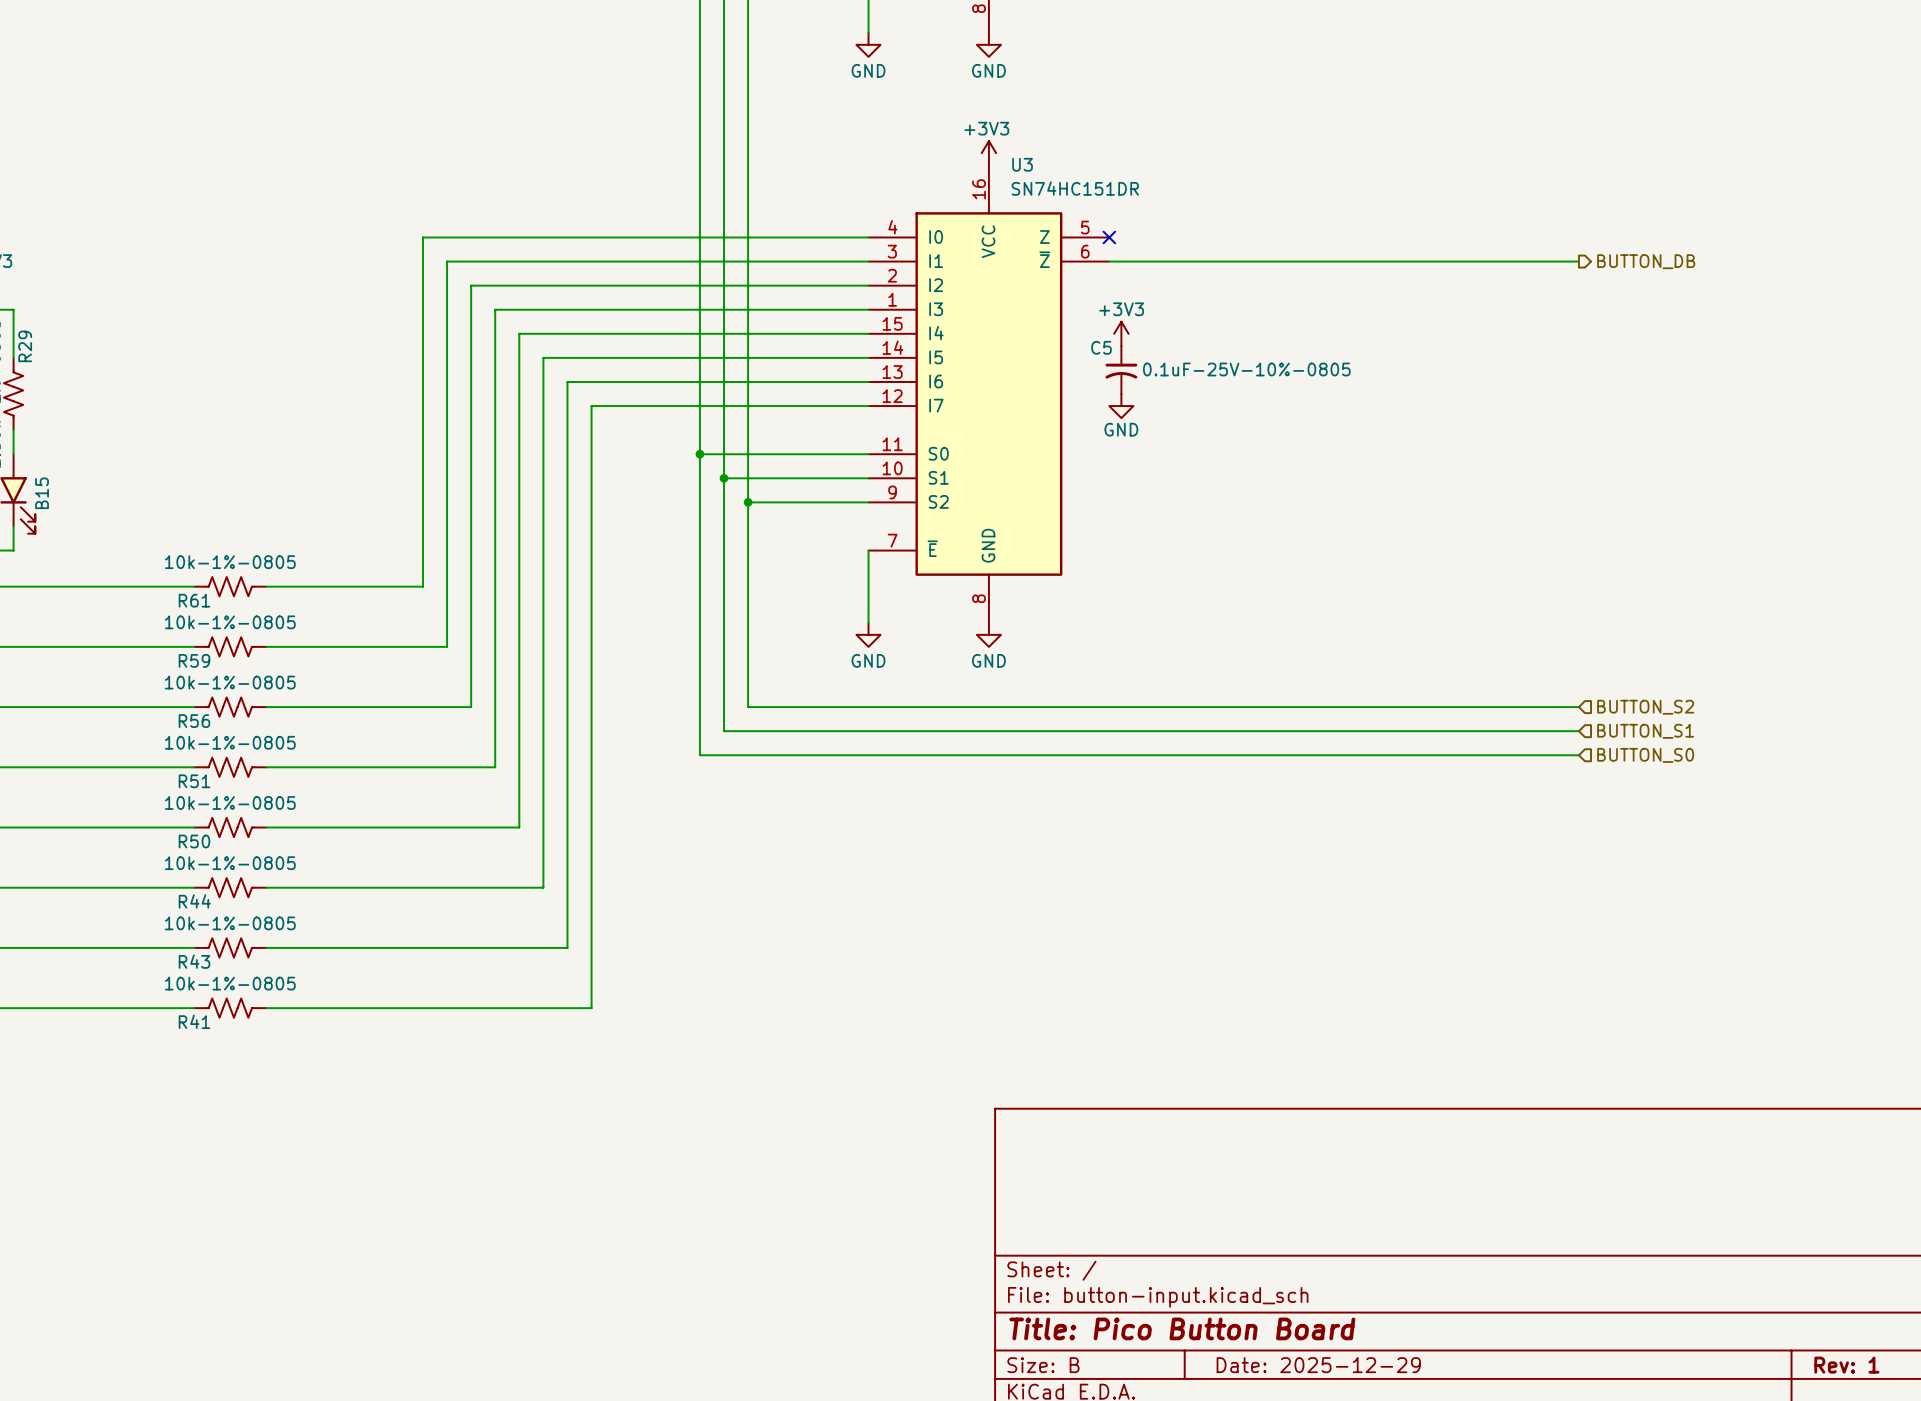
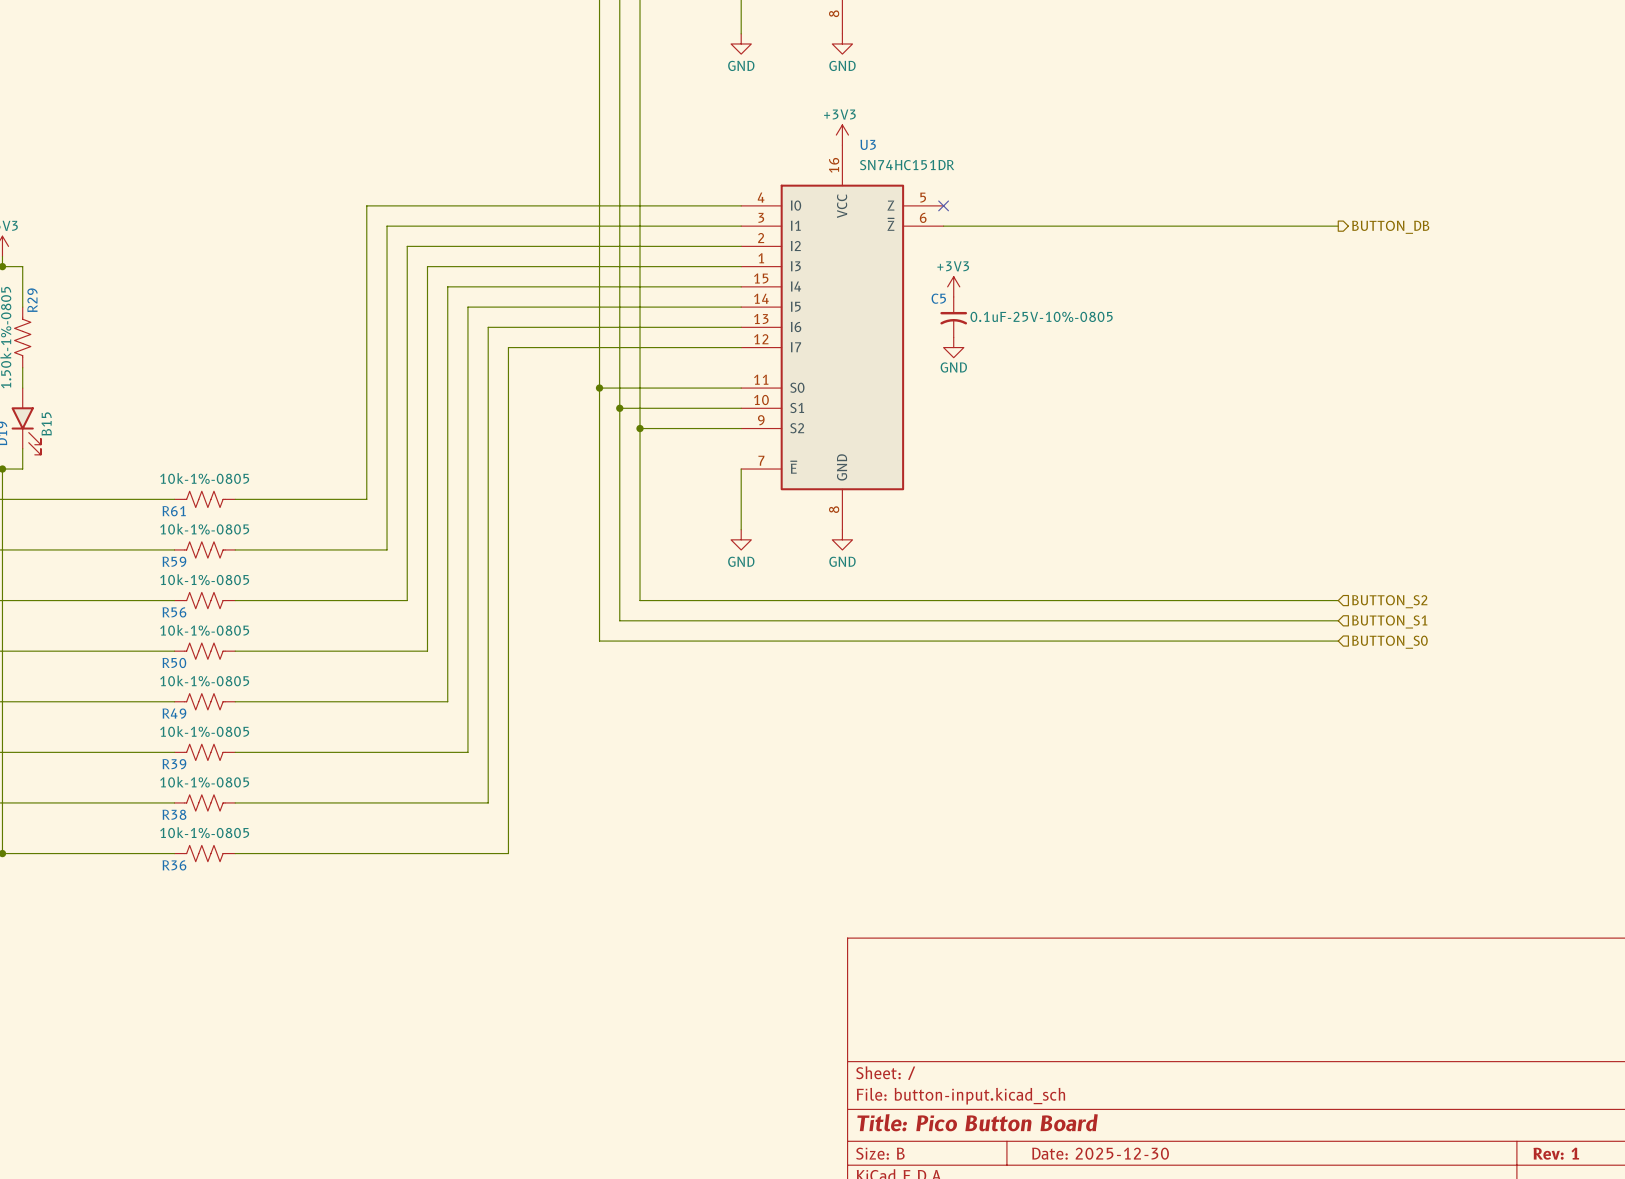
R51 name: R51 (194, 781) -> R50 (174, 663)
R50 name: R50 (194, 841) -> R49 (174, 713)
R44 name: R44 (194, 901) -> R39 (174, 764)
R43 name: R43 (194, 961) -> R38 (174, 814)
R41 name: R41 (194, 1021) -> R36 (174, 865)
title block: Date: 2025-12-29 (1318, 1365) -> Date: 2025-12-30 (1100, 1153)

